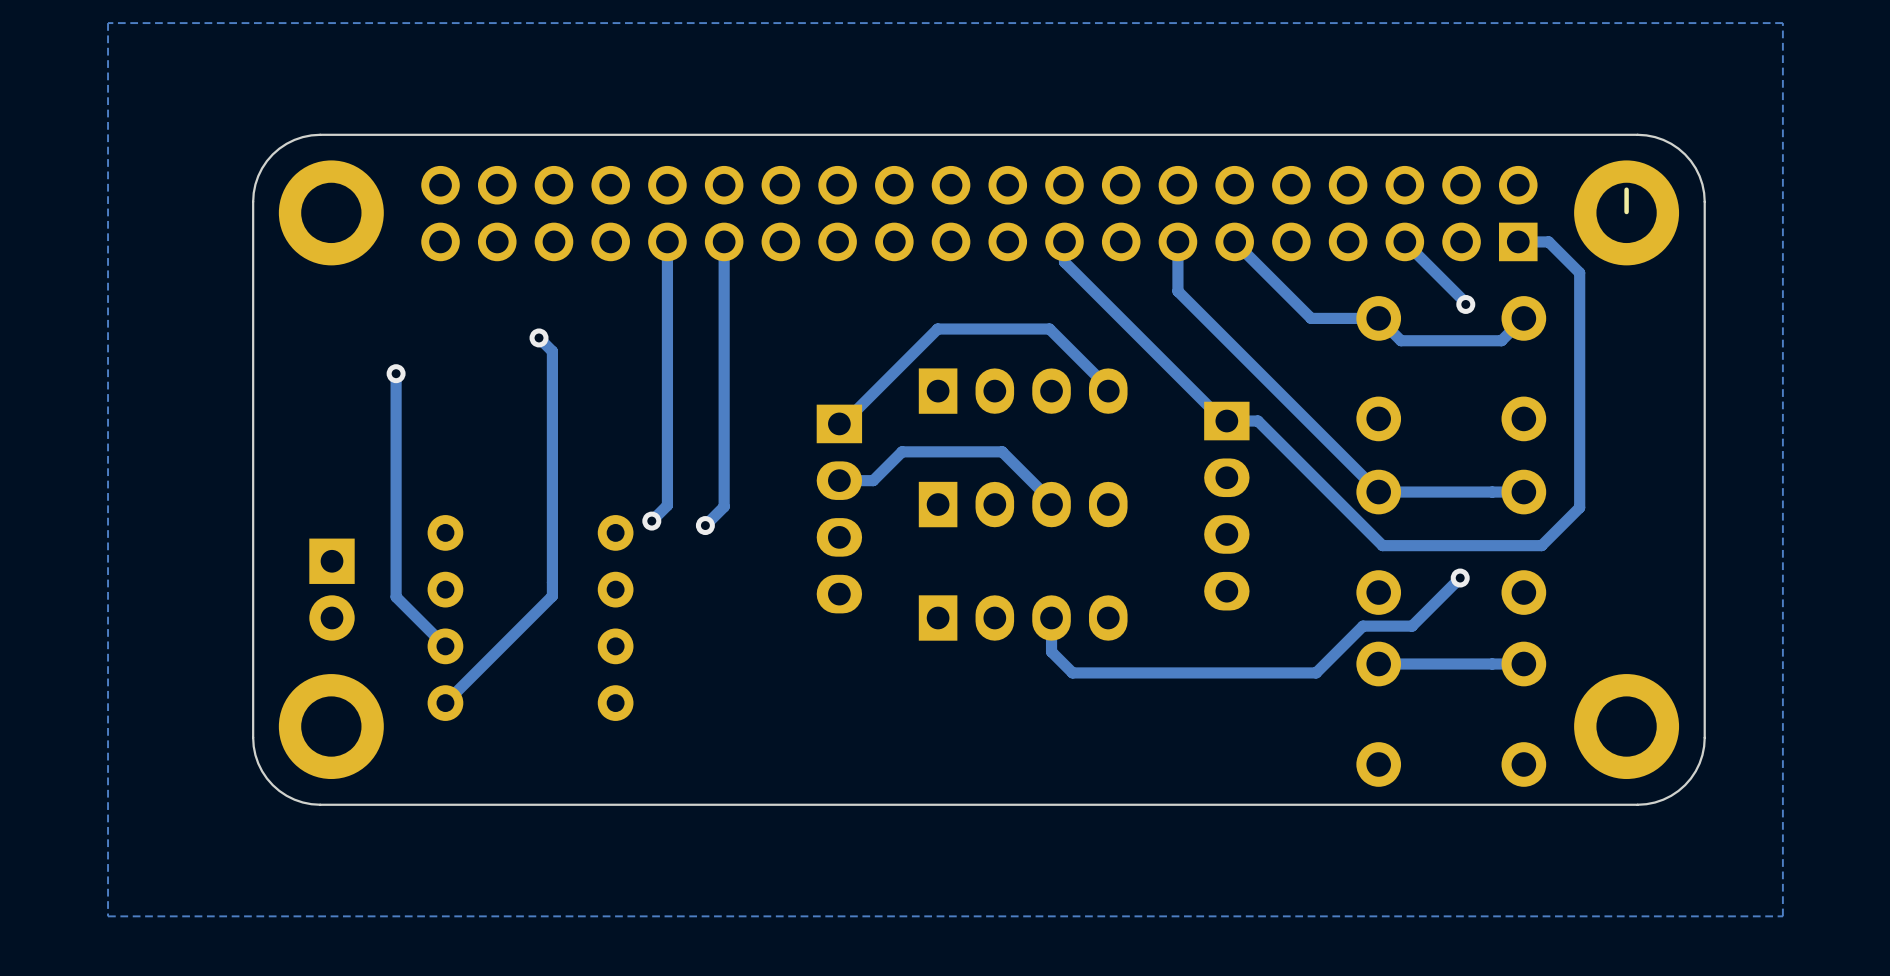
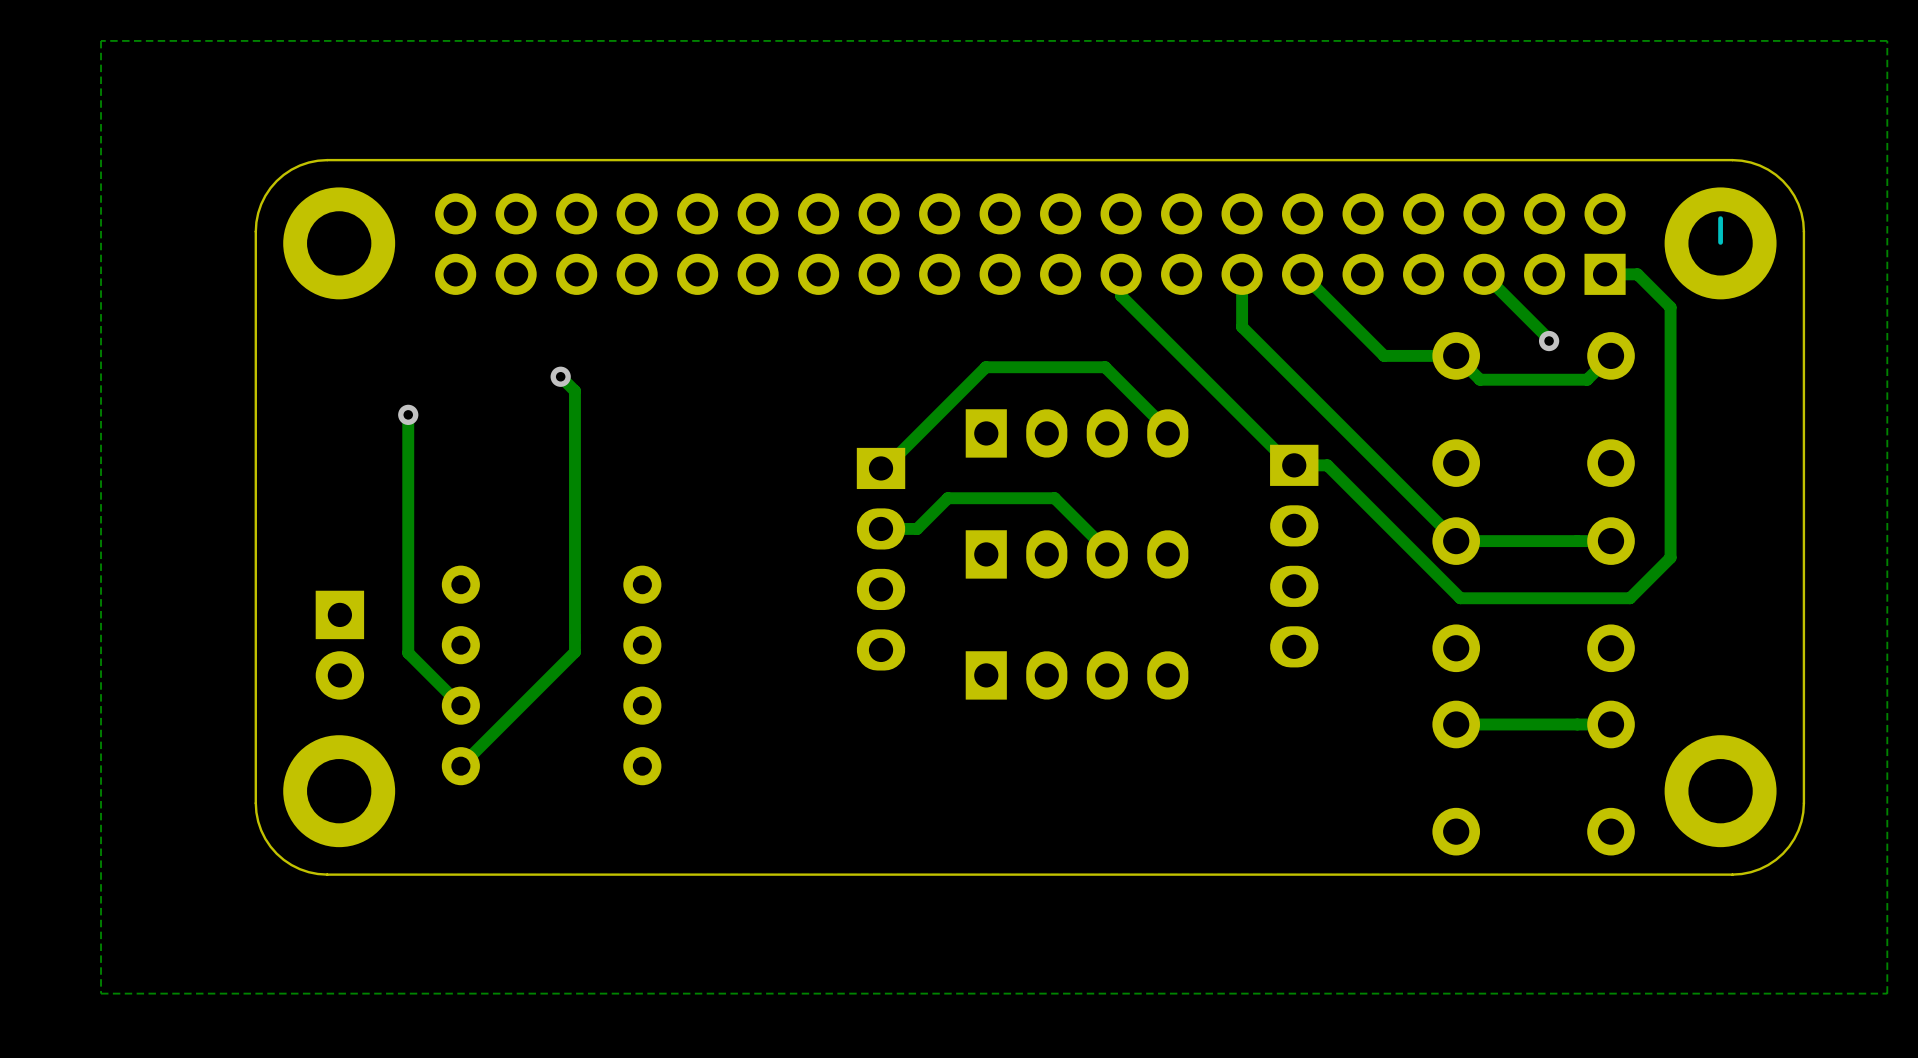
track: (667, 241) (667, 505) (651, 521) -> none
track: (724, 241) (724, 506) (705, 525) -> none
via: (651, 521) -> none
via: (705, 525) -> none
track: (1460, 578) (1412, 626) (1362, 626) (1316, 672) (1072, 672) (1051, 651) (1051, 618) -> none
via: (1460, 578) -> none

